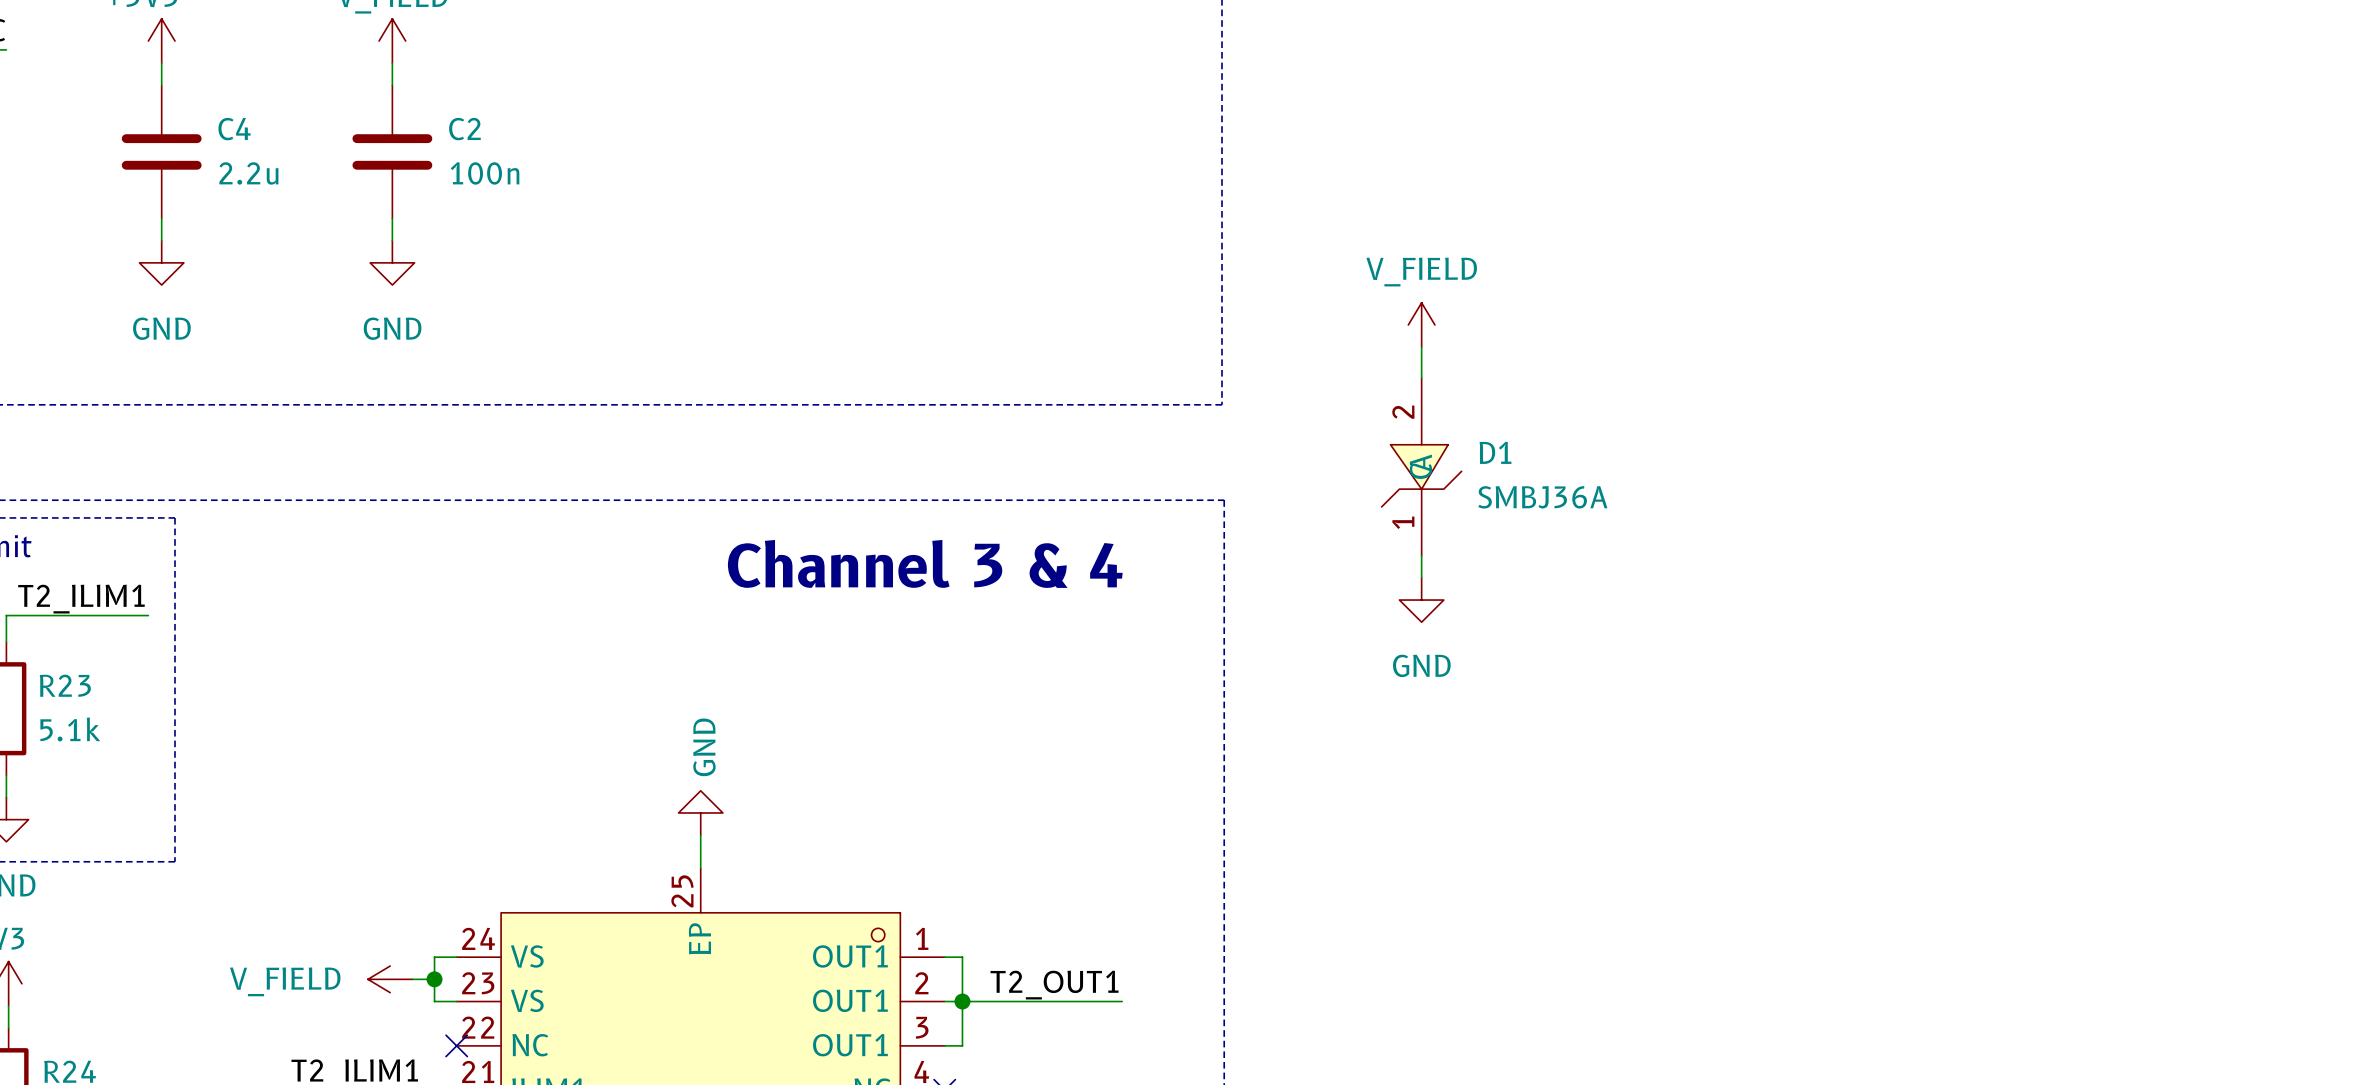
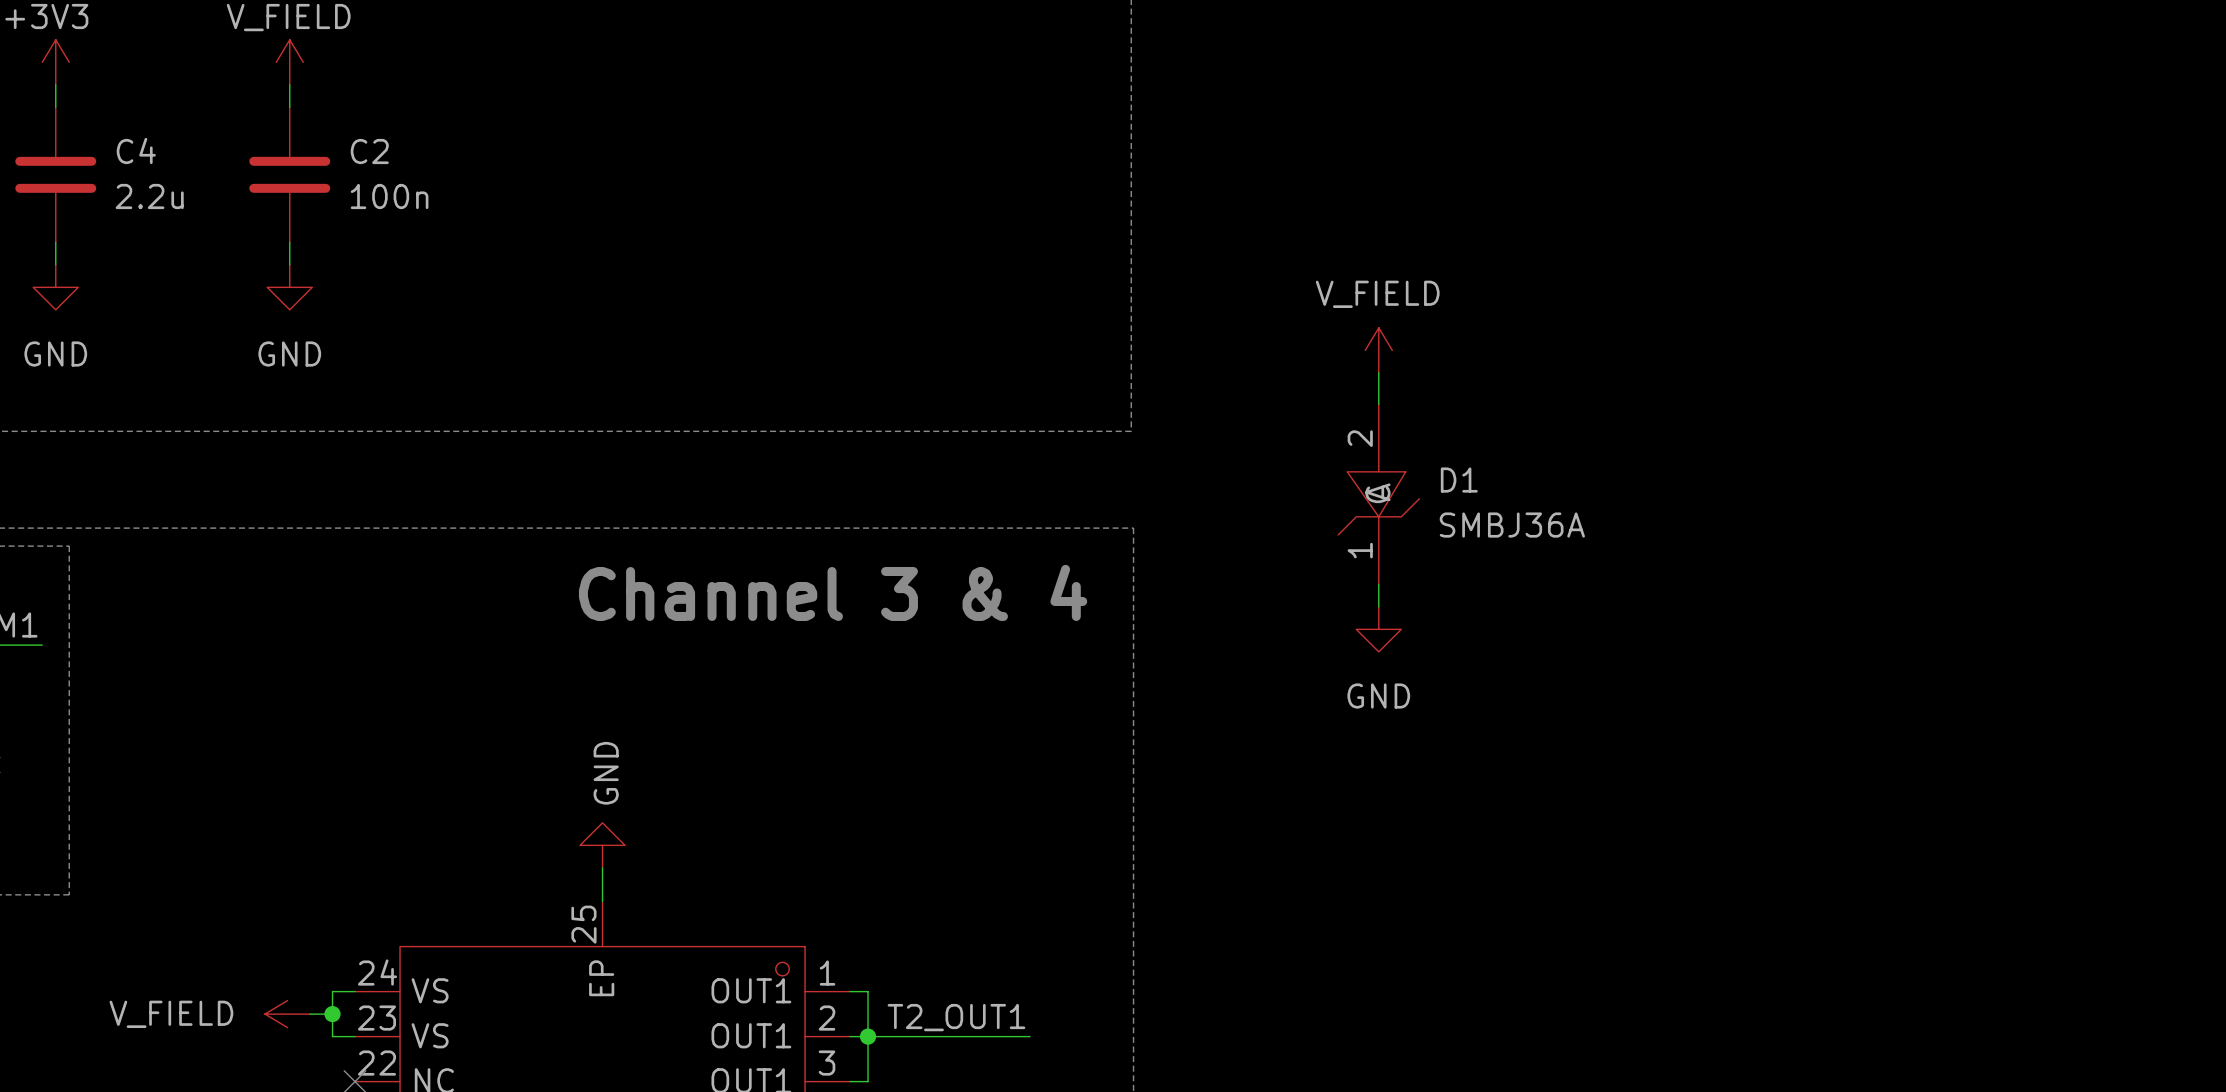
power symbol position: V_FIELD (1421, 324) -> V_FIELD (1378, 350)
wire: (1421, 347) (1421, 378) -> (1378, 372) (1378, 404)
D1 position: (1421, 466) -> (1378, 494)
wire: (1421, 555) (1421, 577) -> (1378, 584) (1378, 606)
power symbol position: GND (1421, 600) -> GND (1378, 629)

